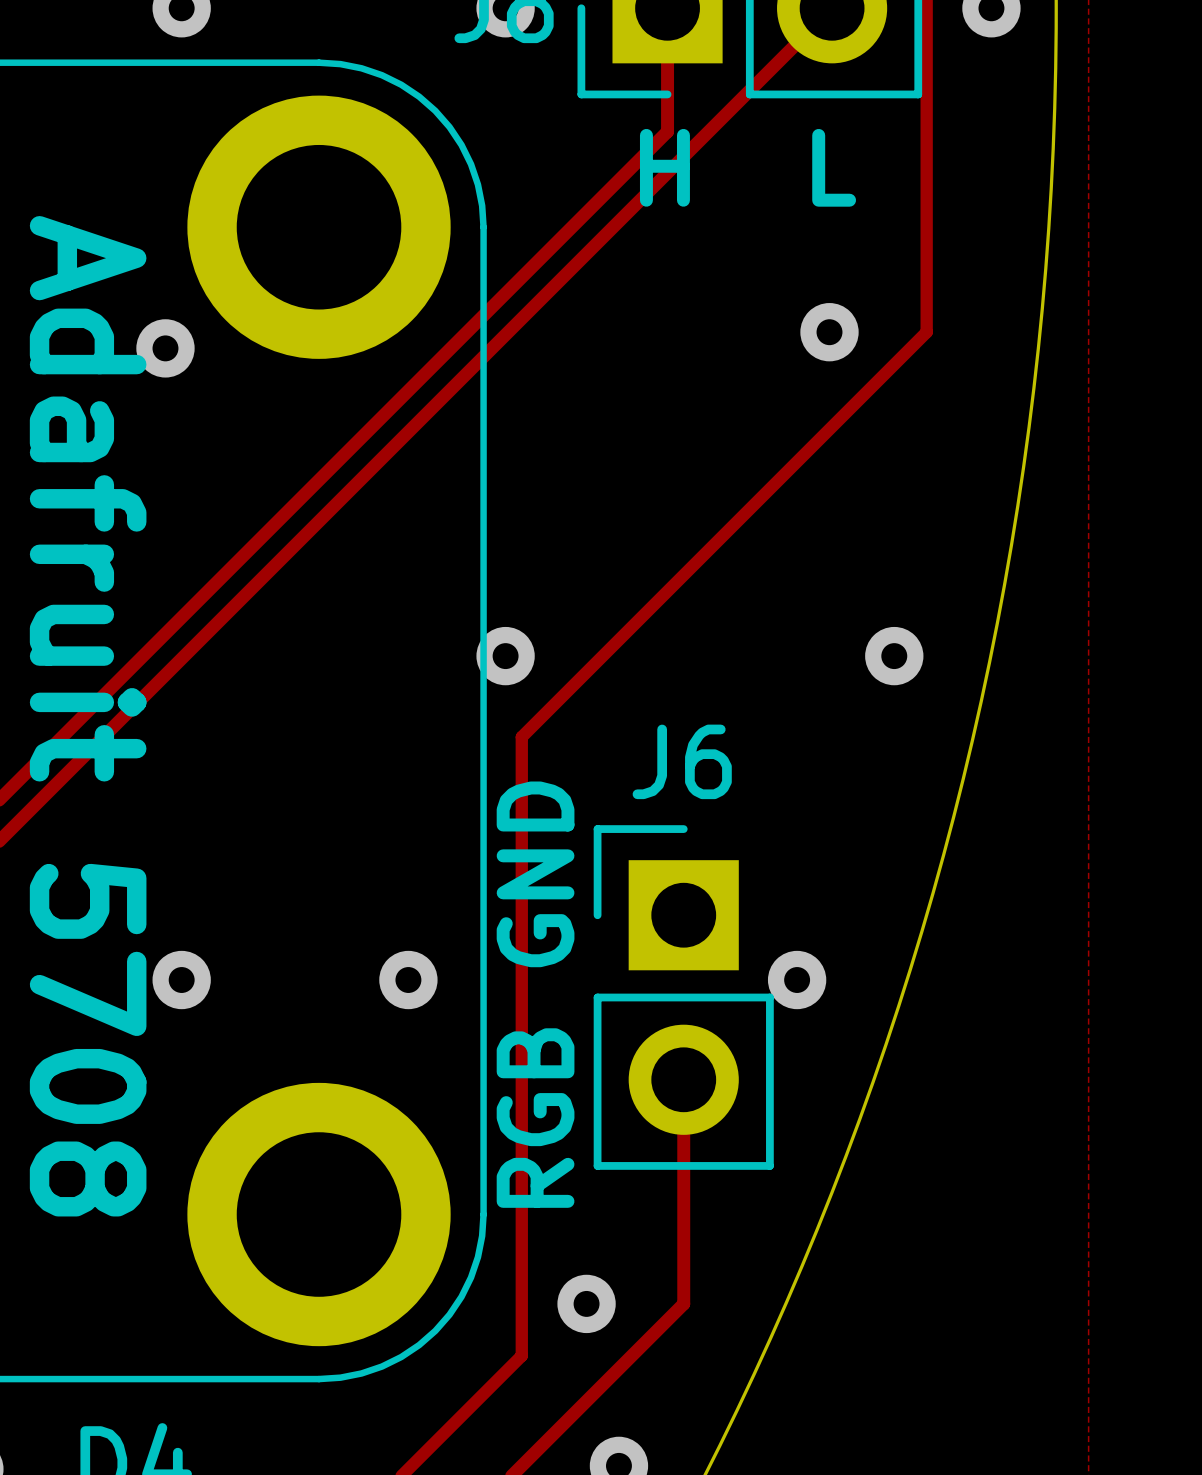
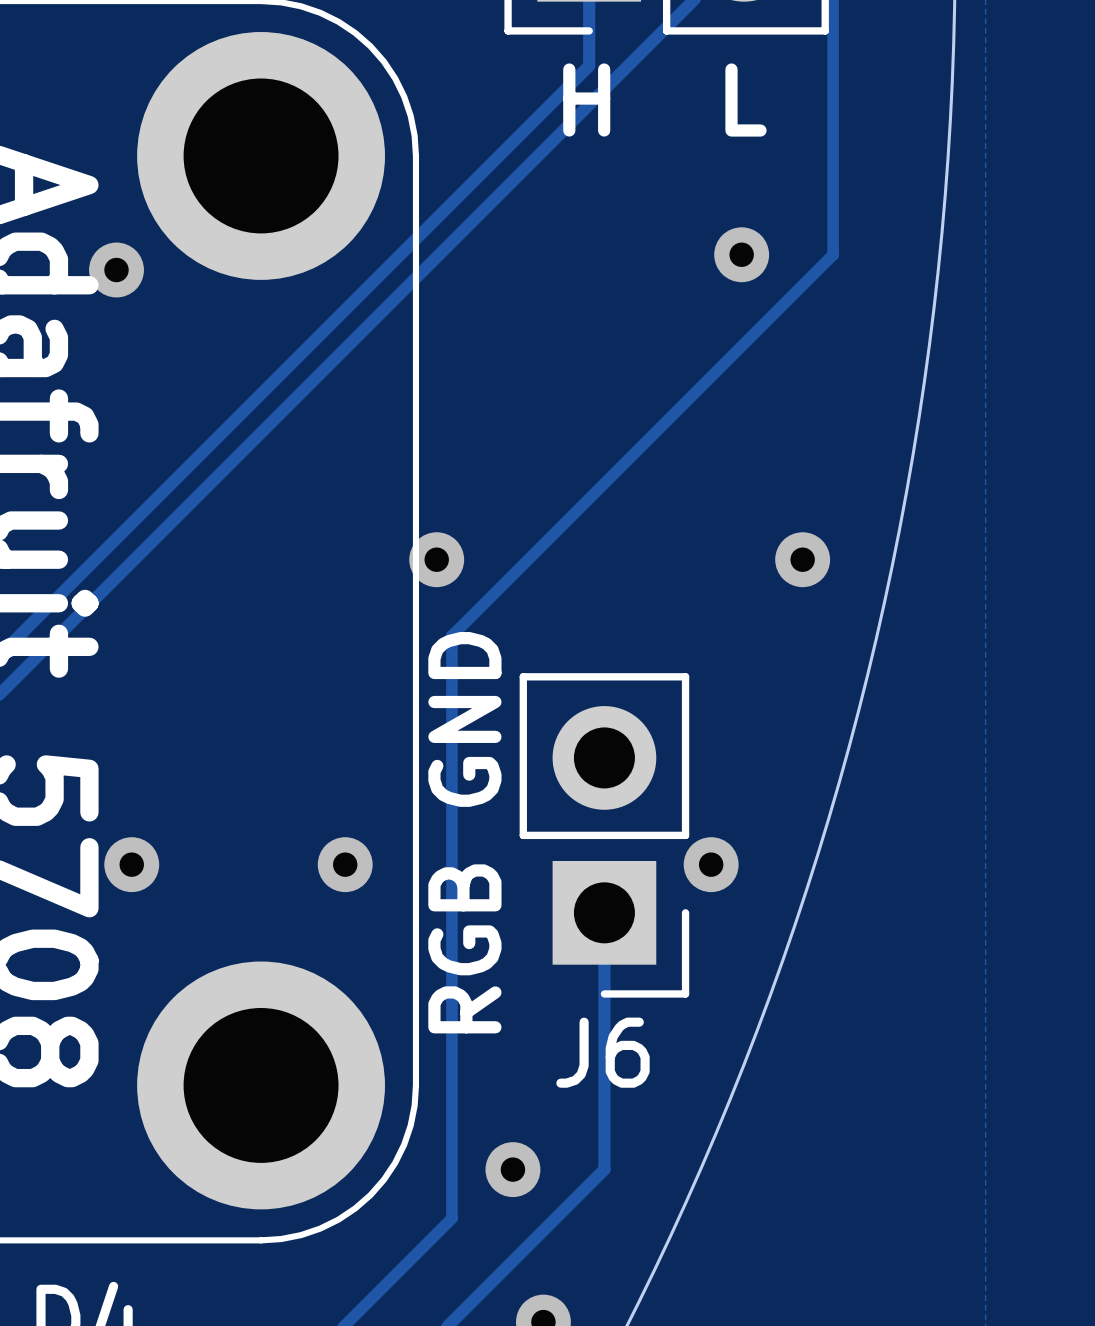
text position: RGB GND (535, 994) -> RGB GND (464, 832)
J6 rotation: 0° (683, 997) -> 180° (604, 835)

